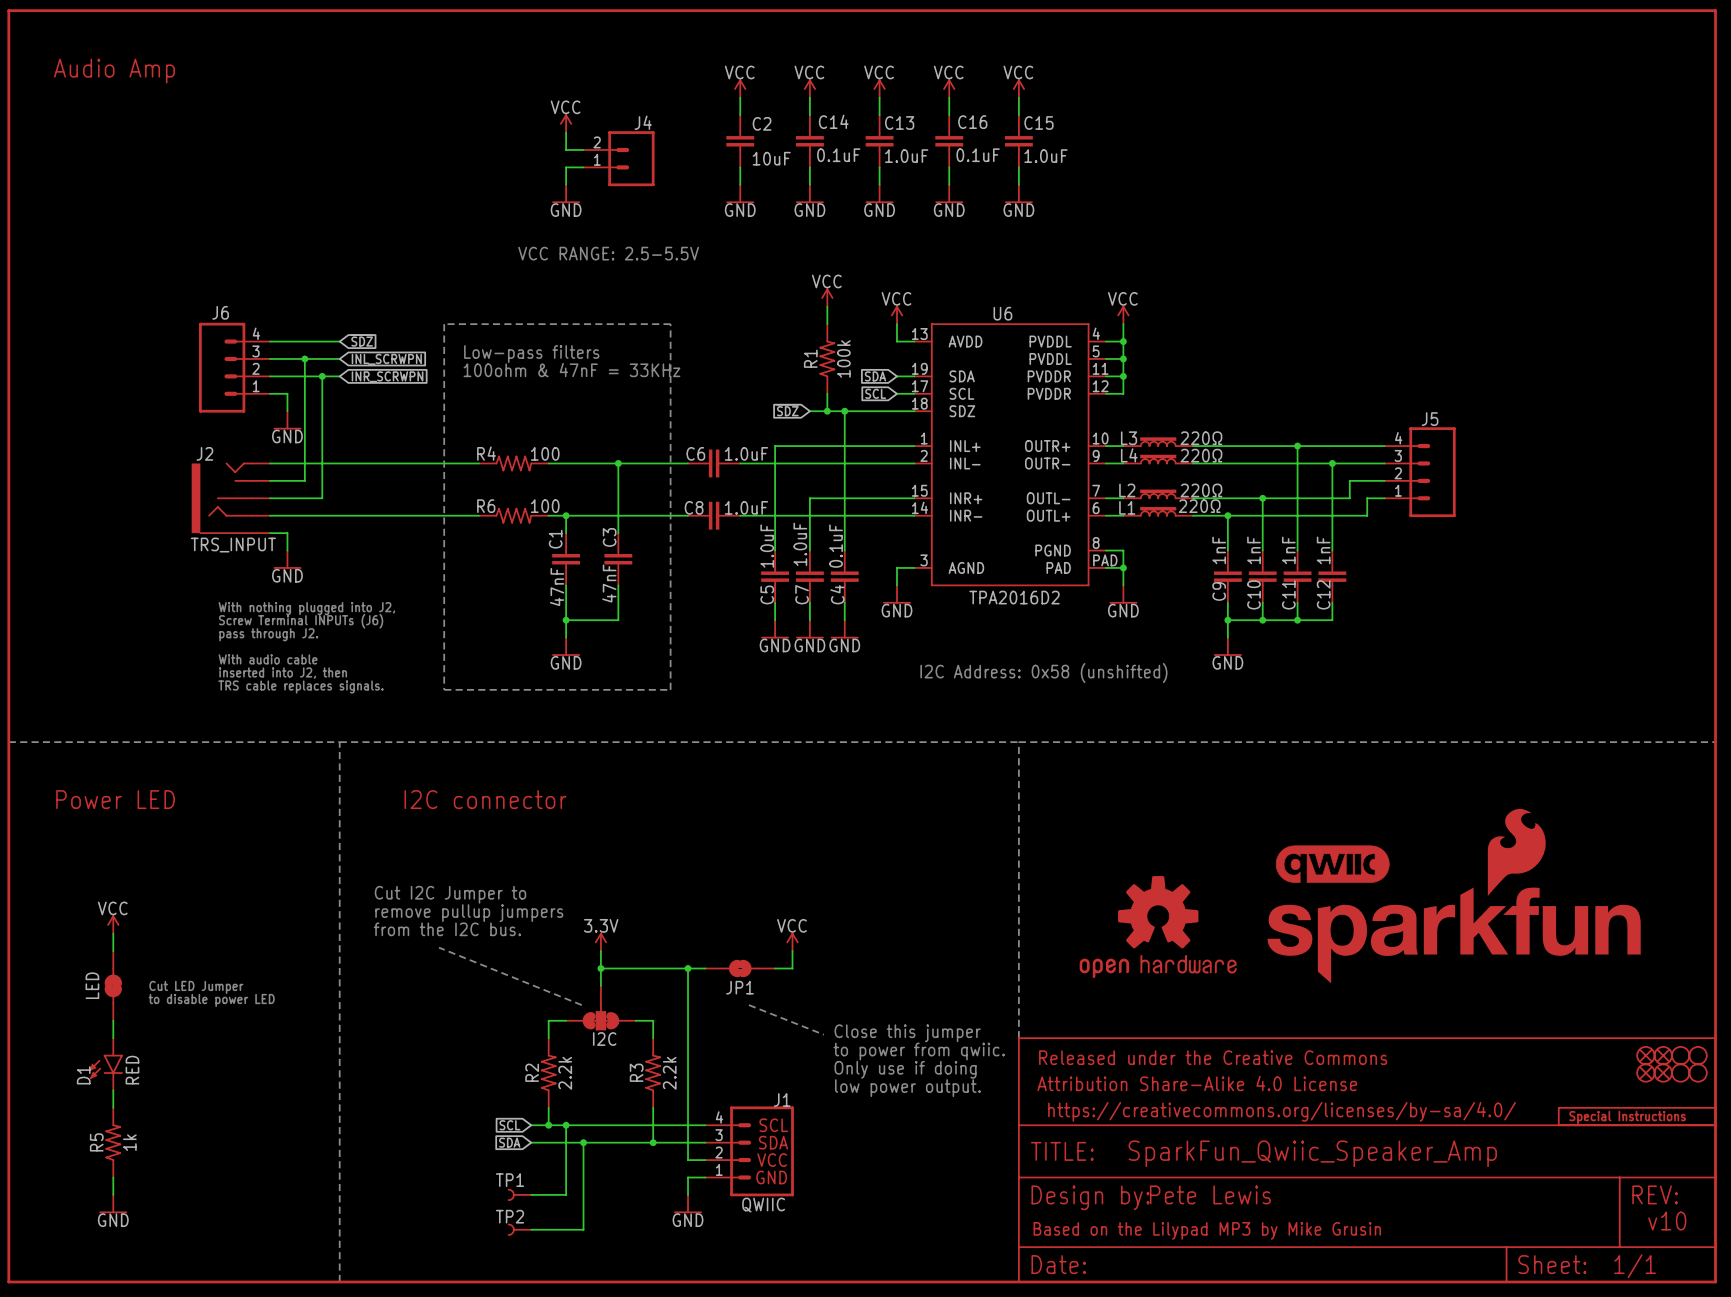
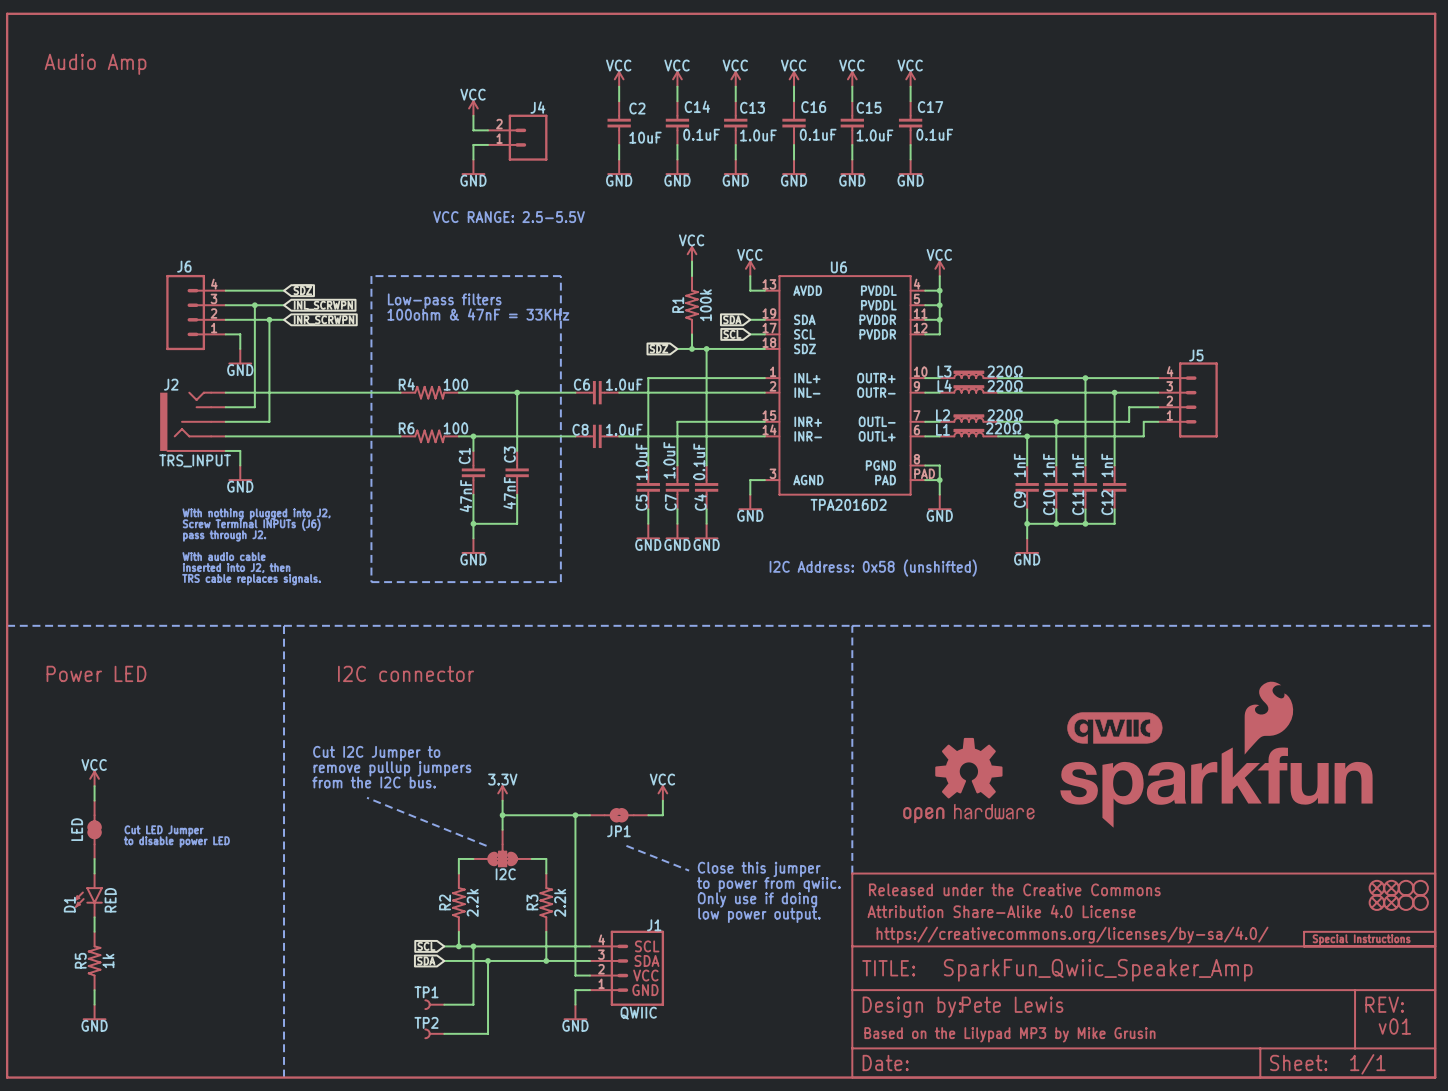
power symbol: none -> VCC (910, 79)
wire: none -> (910, 86) (910, 101)
C17: none -> 0.1uF (910, 123)
wire: none -> (910, 144) (910, 159)
power symbol: none -> GND (910, 167)
text: v10 (1667, 1221) -> v01 (1394, 1026)

